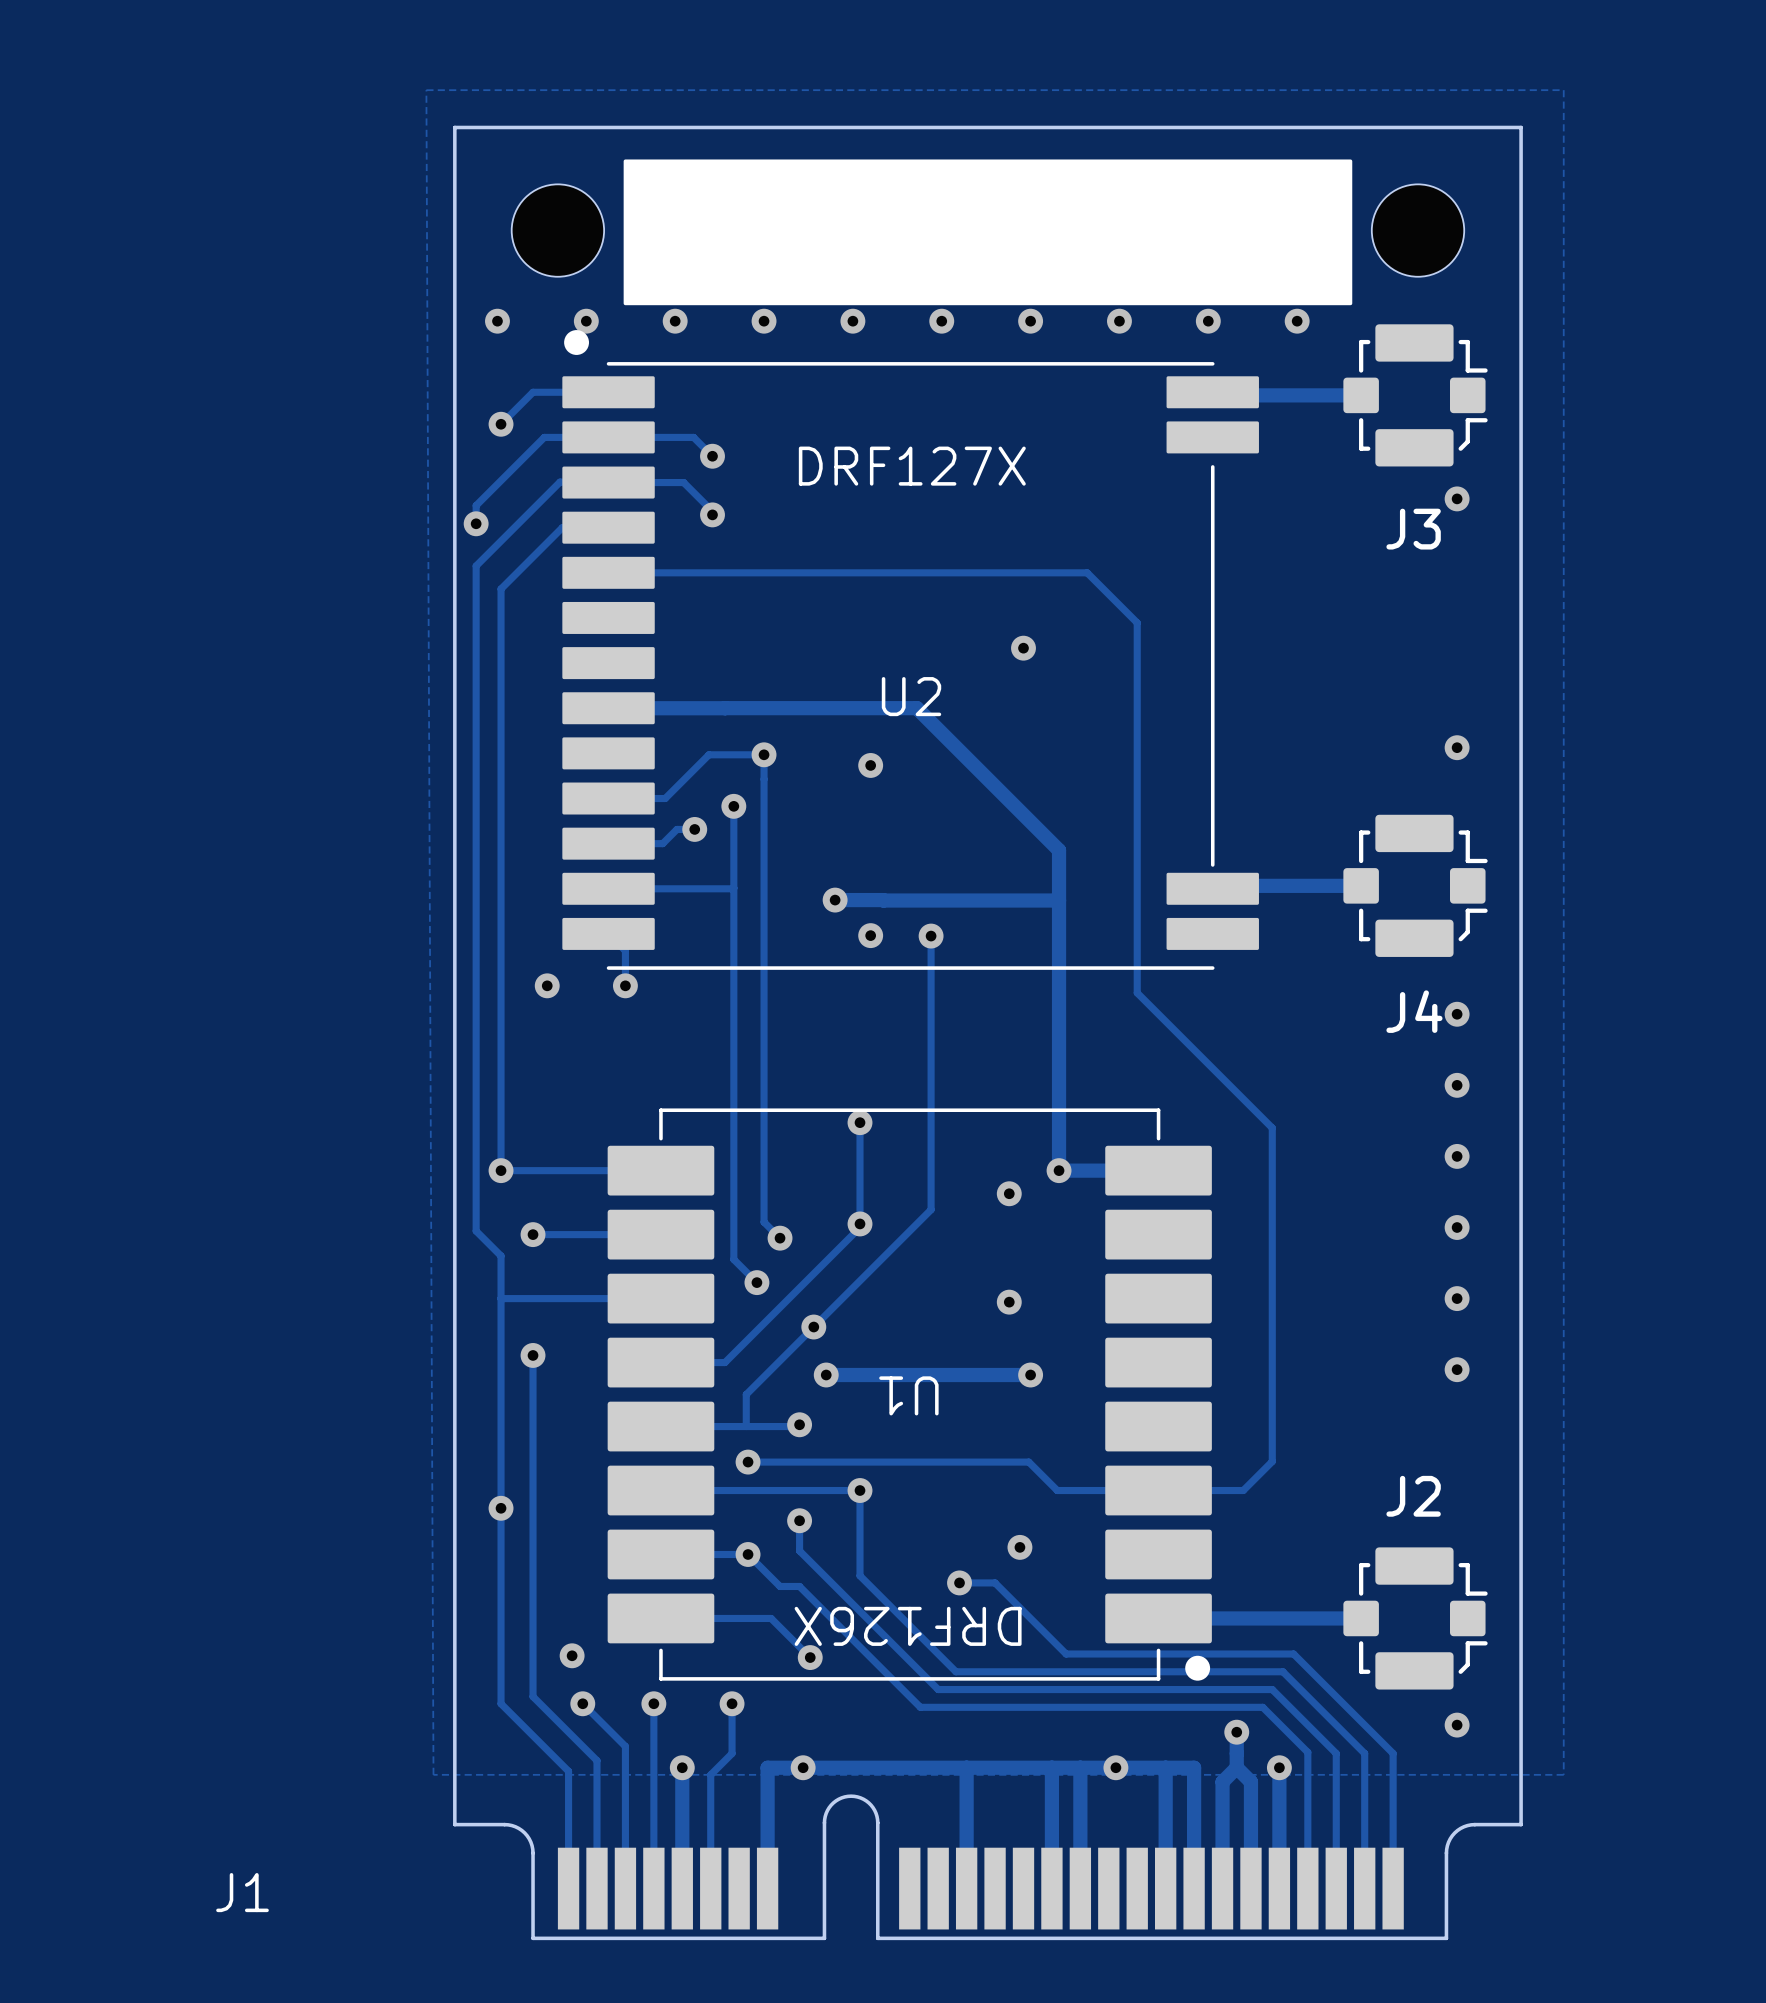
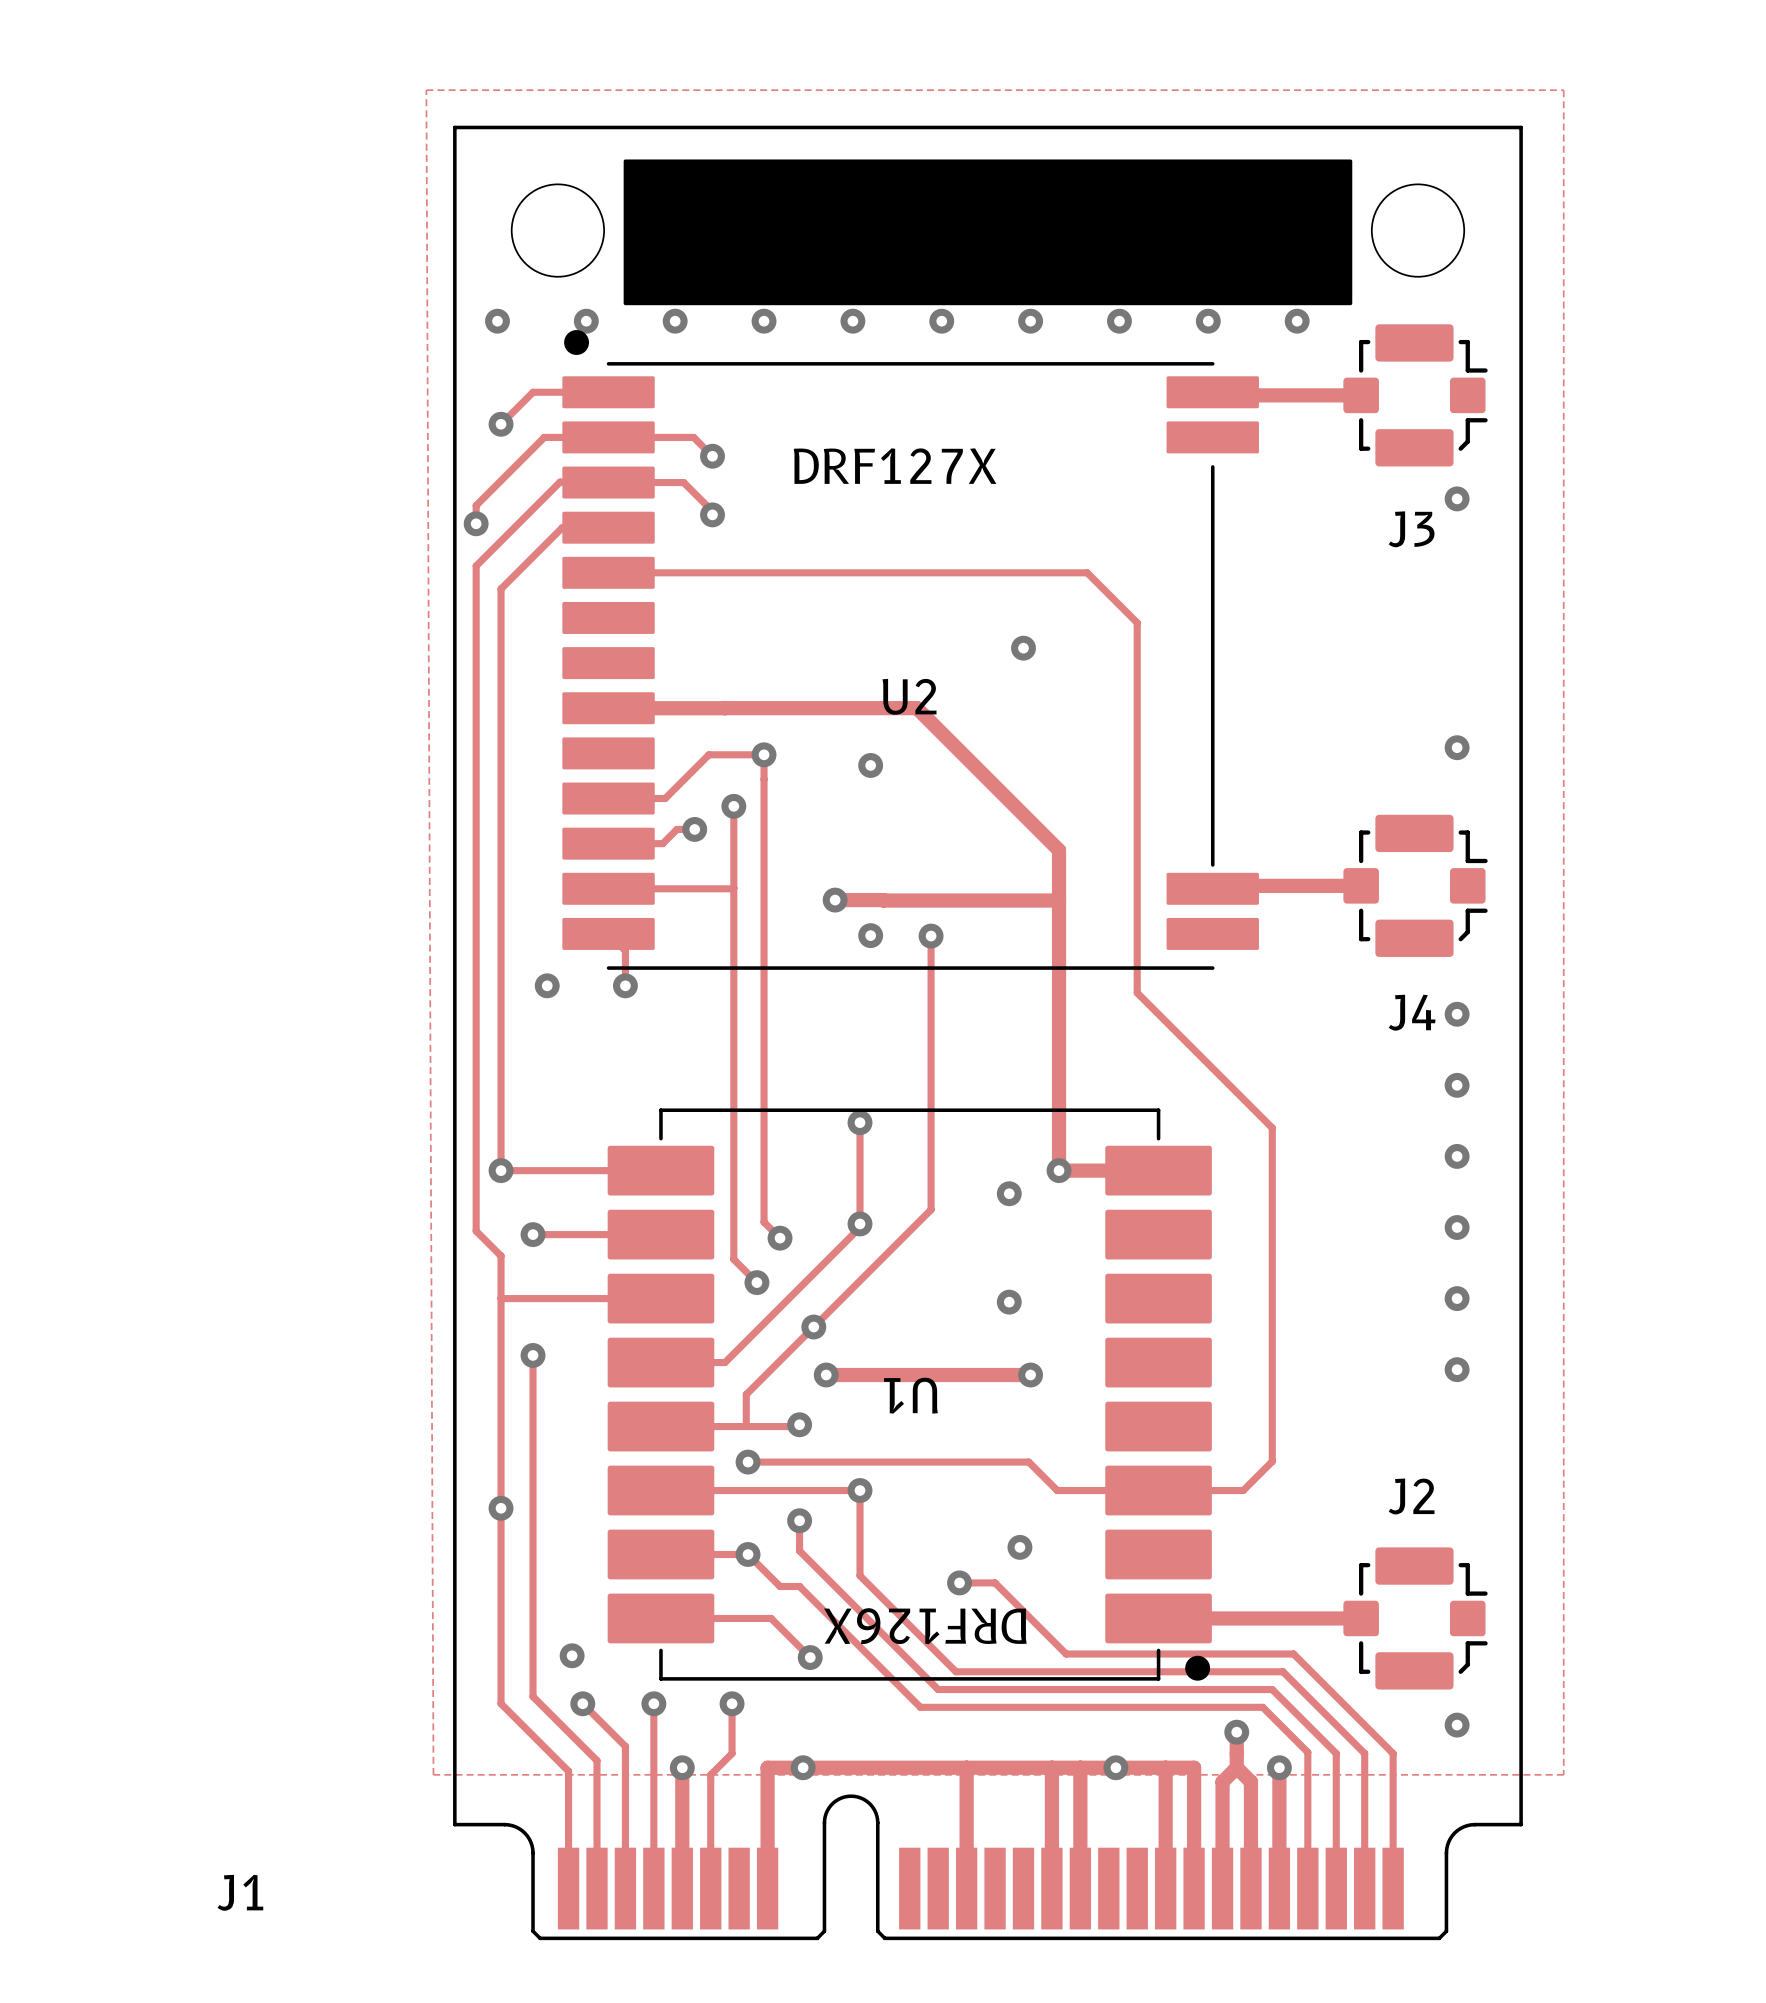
J1 footprint: [453, 125, 1523, 1941] -> [453, 125, 1523, 1941]

